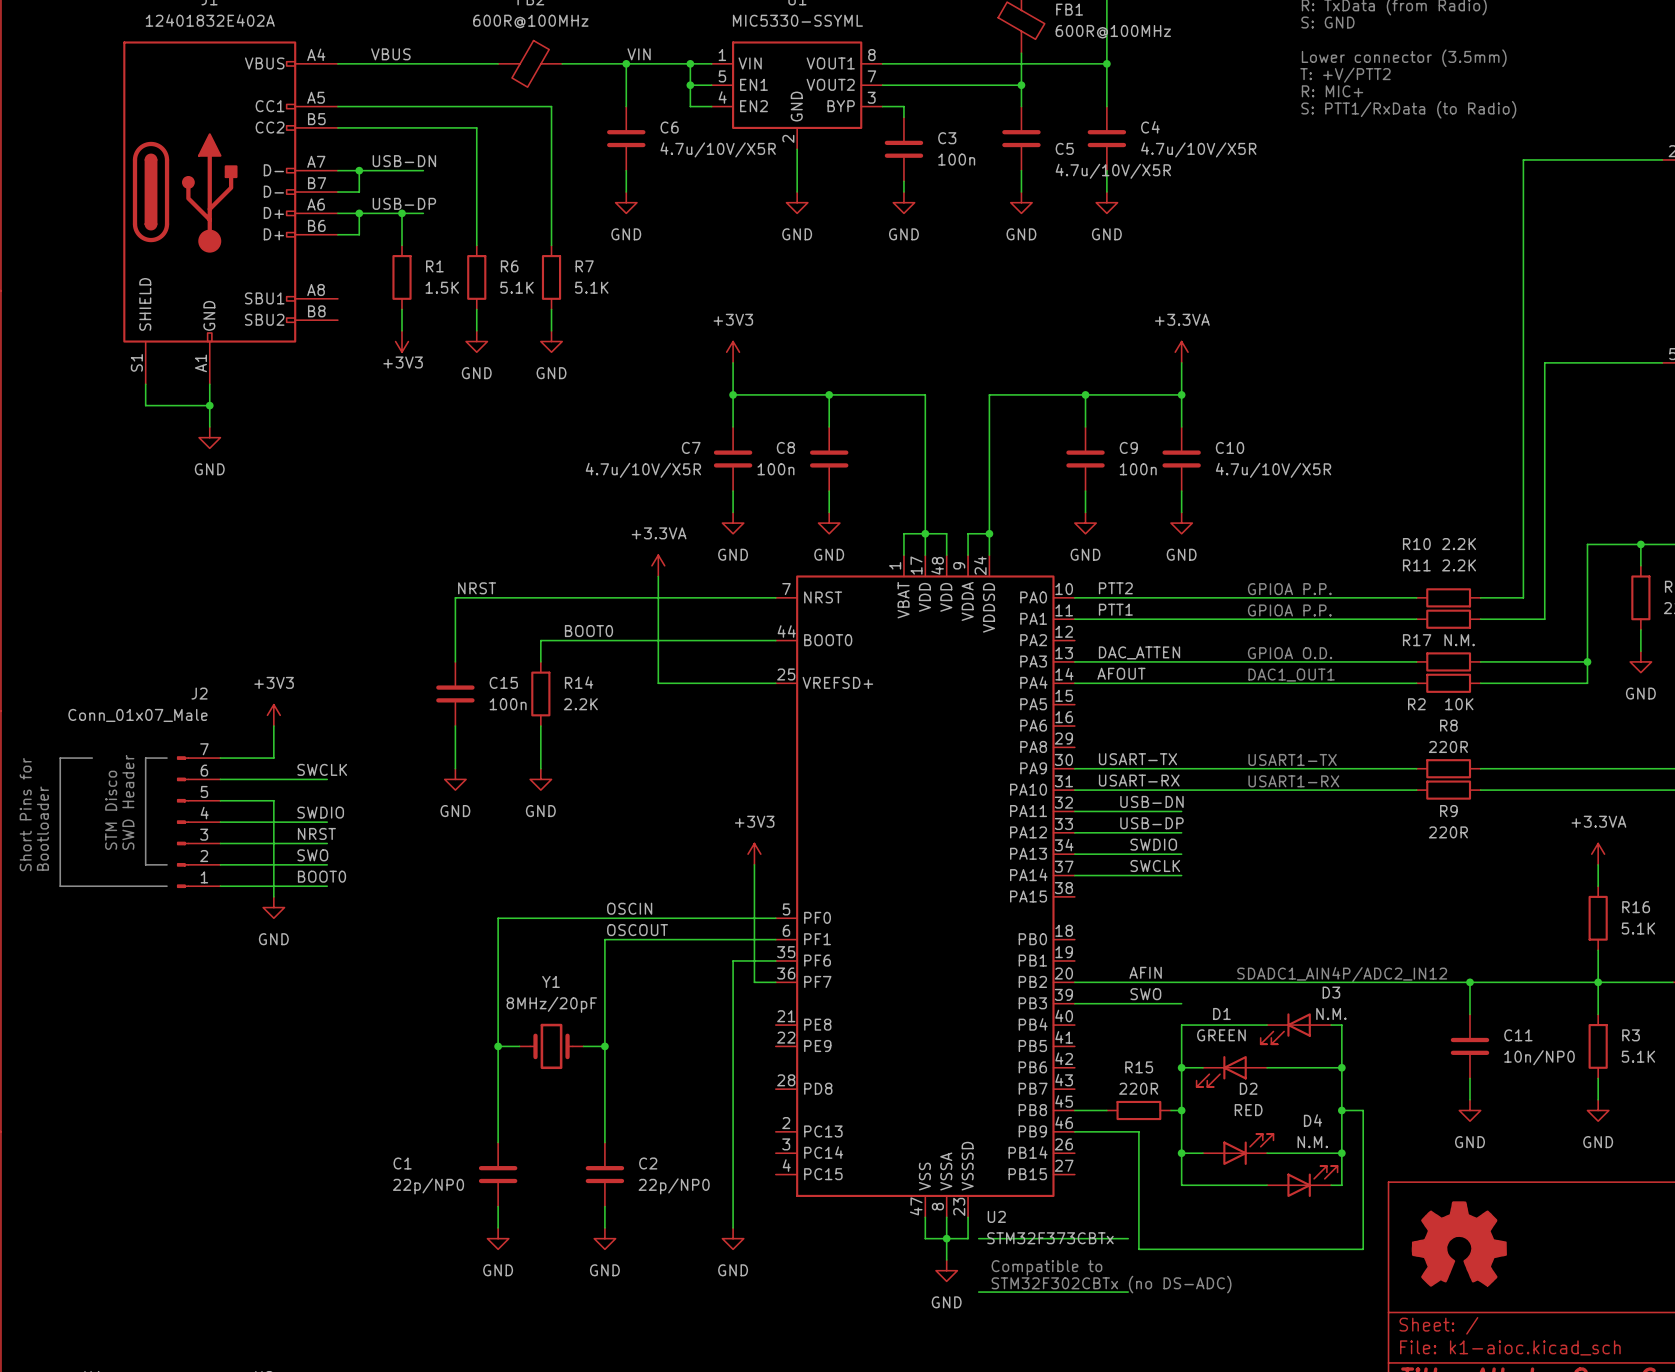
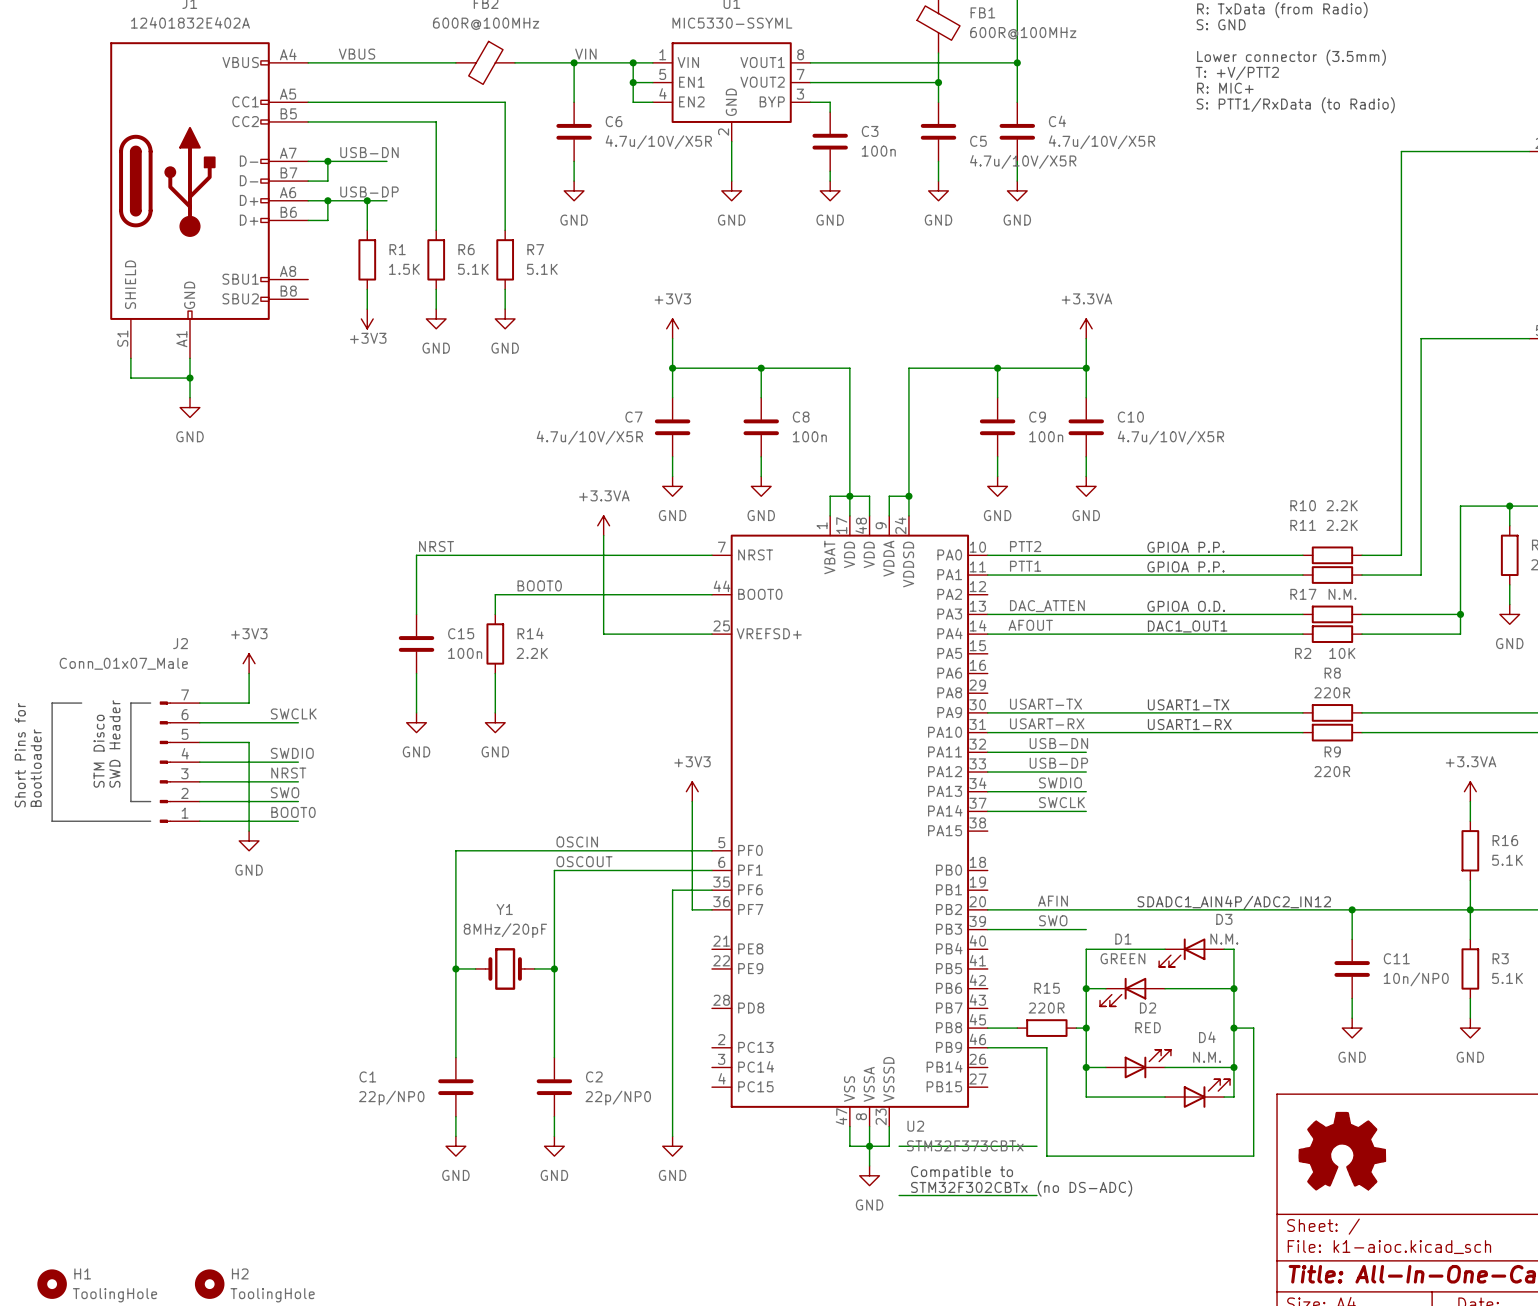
C8 name position: C8 (785, 447) -> C8 (801, 417)
C8 value position: 100n (775, 469) -> 100n (809, 436)

